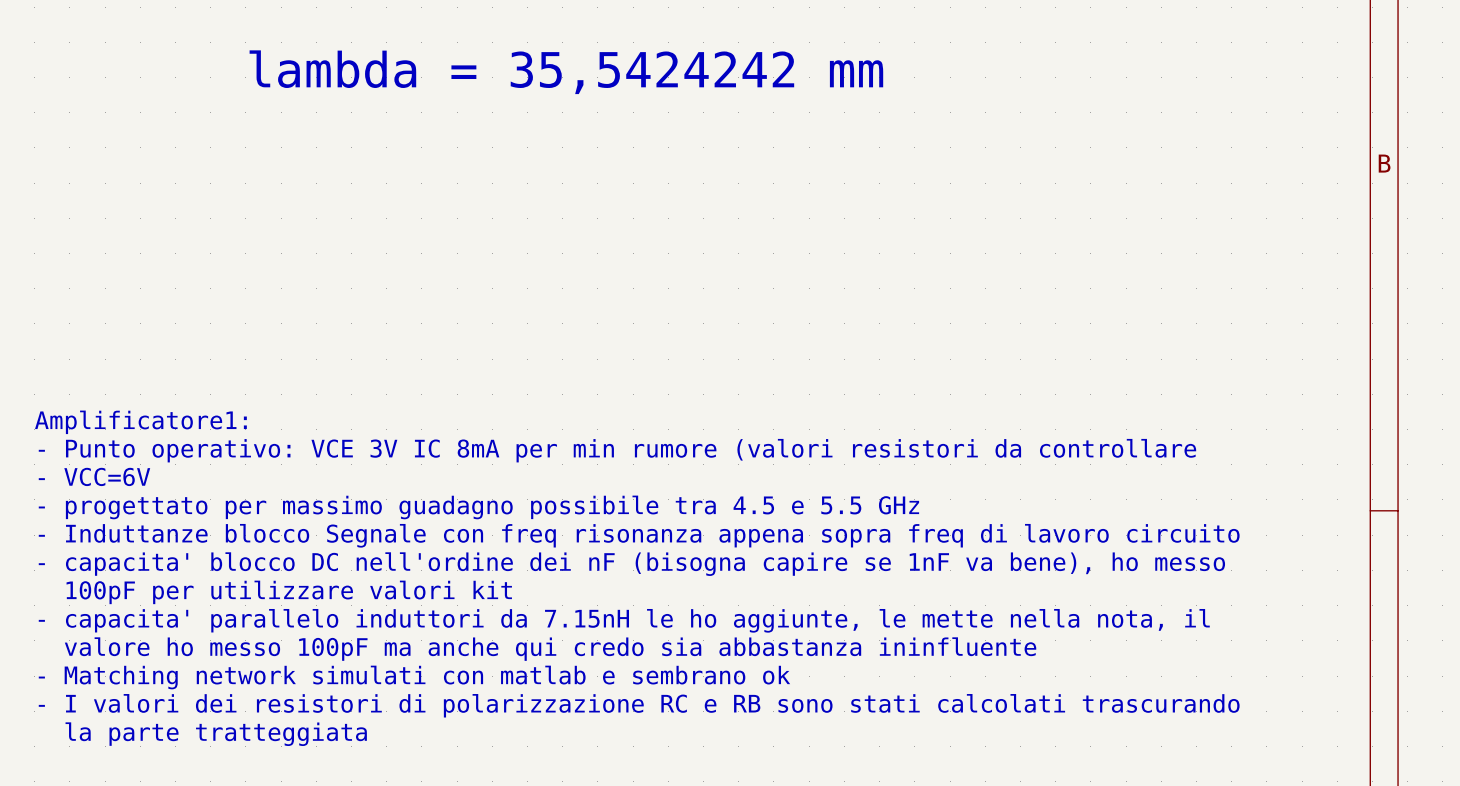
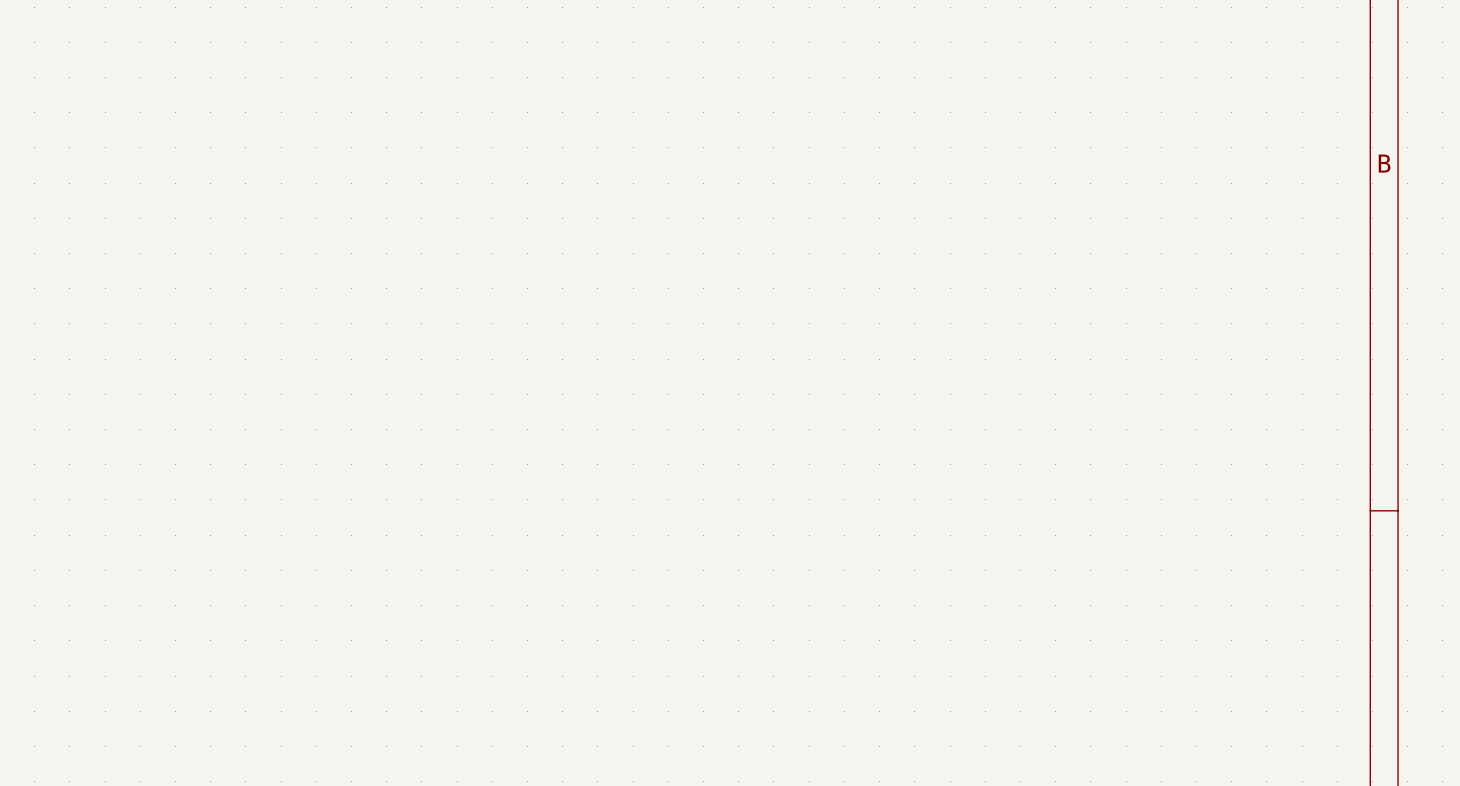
text: lambda = 35,5424242 mm (566, 72) -> none
text: Amplificatore1: (140, 422) -> none
text: - Punto operativo: VCE 3V IC 8mA per min rumore (valori resistori da controllare (617, 450) -> none
text: - VCC=6V (94, 476) -> none
text: - progettato per massimo guadagno possibile tra 4.5 e 5.5 GHz (478, 507) -> none
text: - Induttanze blocco Segnale con freq risonanza appena sopra freq di lavoro circuito (639, 535) -> none
text: - capacita' blocco DC nell'ordine dei nF (bisogna capire se 1nF va bene), ho messo (631, 564) -> none
text: 100pF per utilizzare valori kit (289, 592) -> none
text: - capacita' parallelo induttori da 7.15nH le ho aggiunte, le mette nella nota, il (624, 620) -> none
text: valore ho messo 100pF ma anche qui credo sia abbastanza ininfluente (550, 649) -> none
text: - Matching network simulati con matlab e sembrano ok (414, 677) -> none
text: - I valori dei resistori di polarizzazione RC e RB sono stati calcolati trascurando (639, 705) -> none
text: la parte tratteggiata (216, 734) -> none

